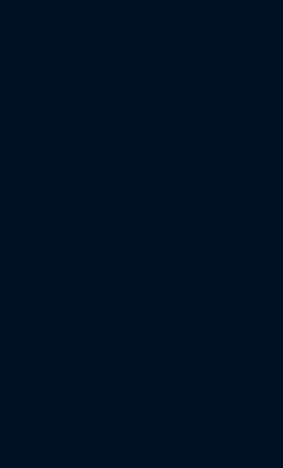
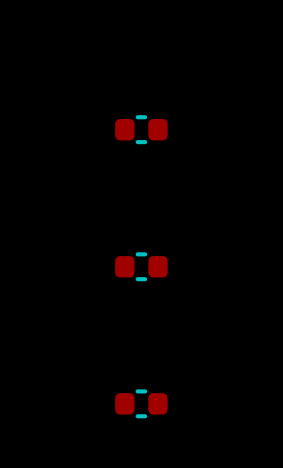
part: none -> (141, 129)
part: none -> (141, 266)
part: none -> (141, 403)

